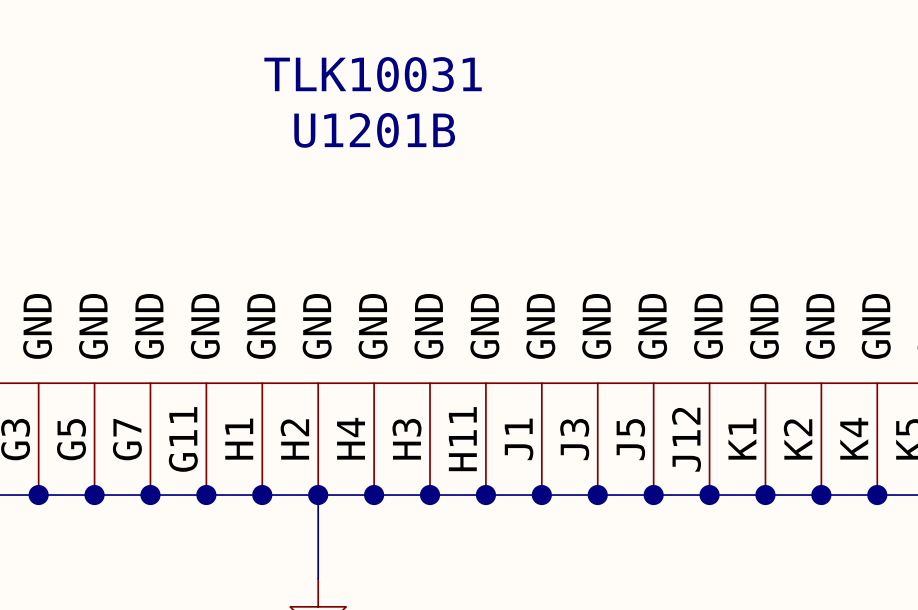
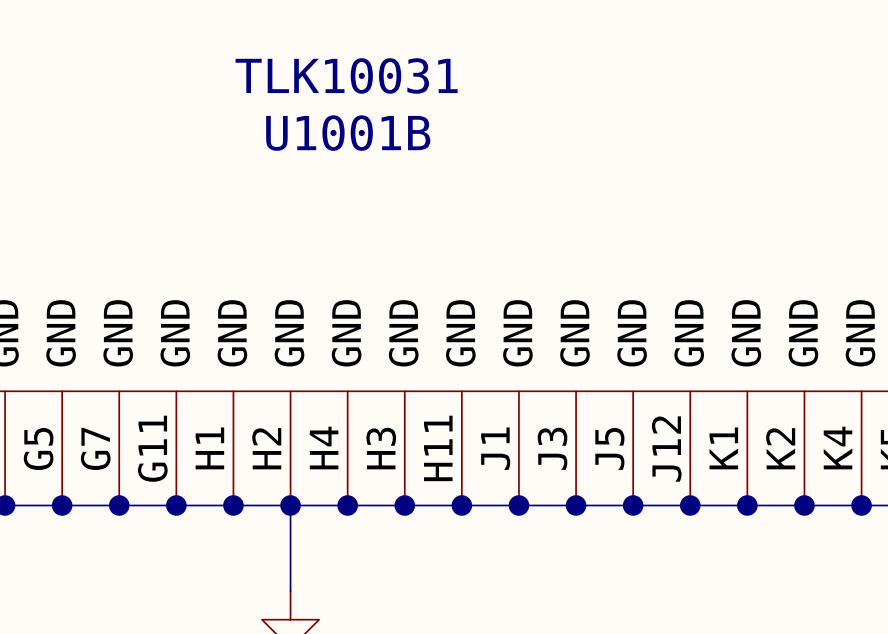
U1201B name: U1201B (374, 130) -> U1001B (348, 133)

